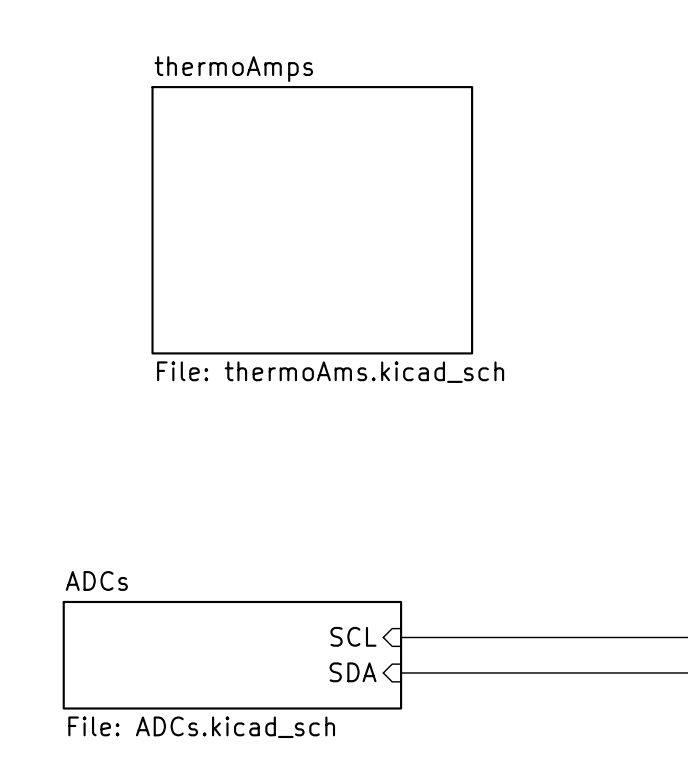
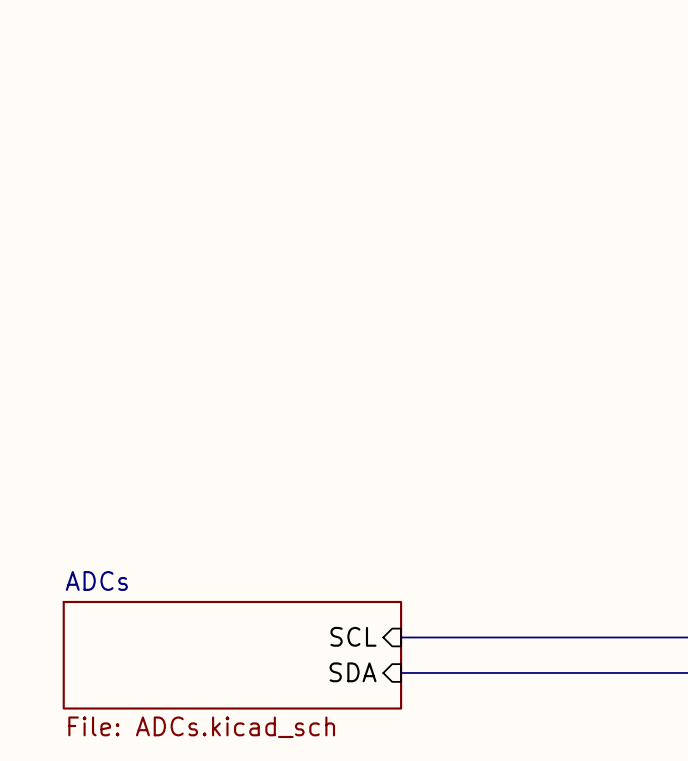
sheet thermoAmps: File: thermoAms.kicad_sch (312, 220) -> none

